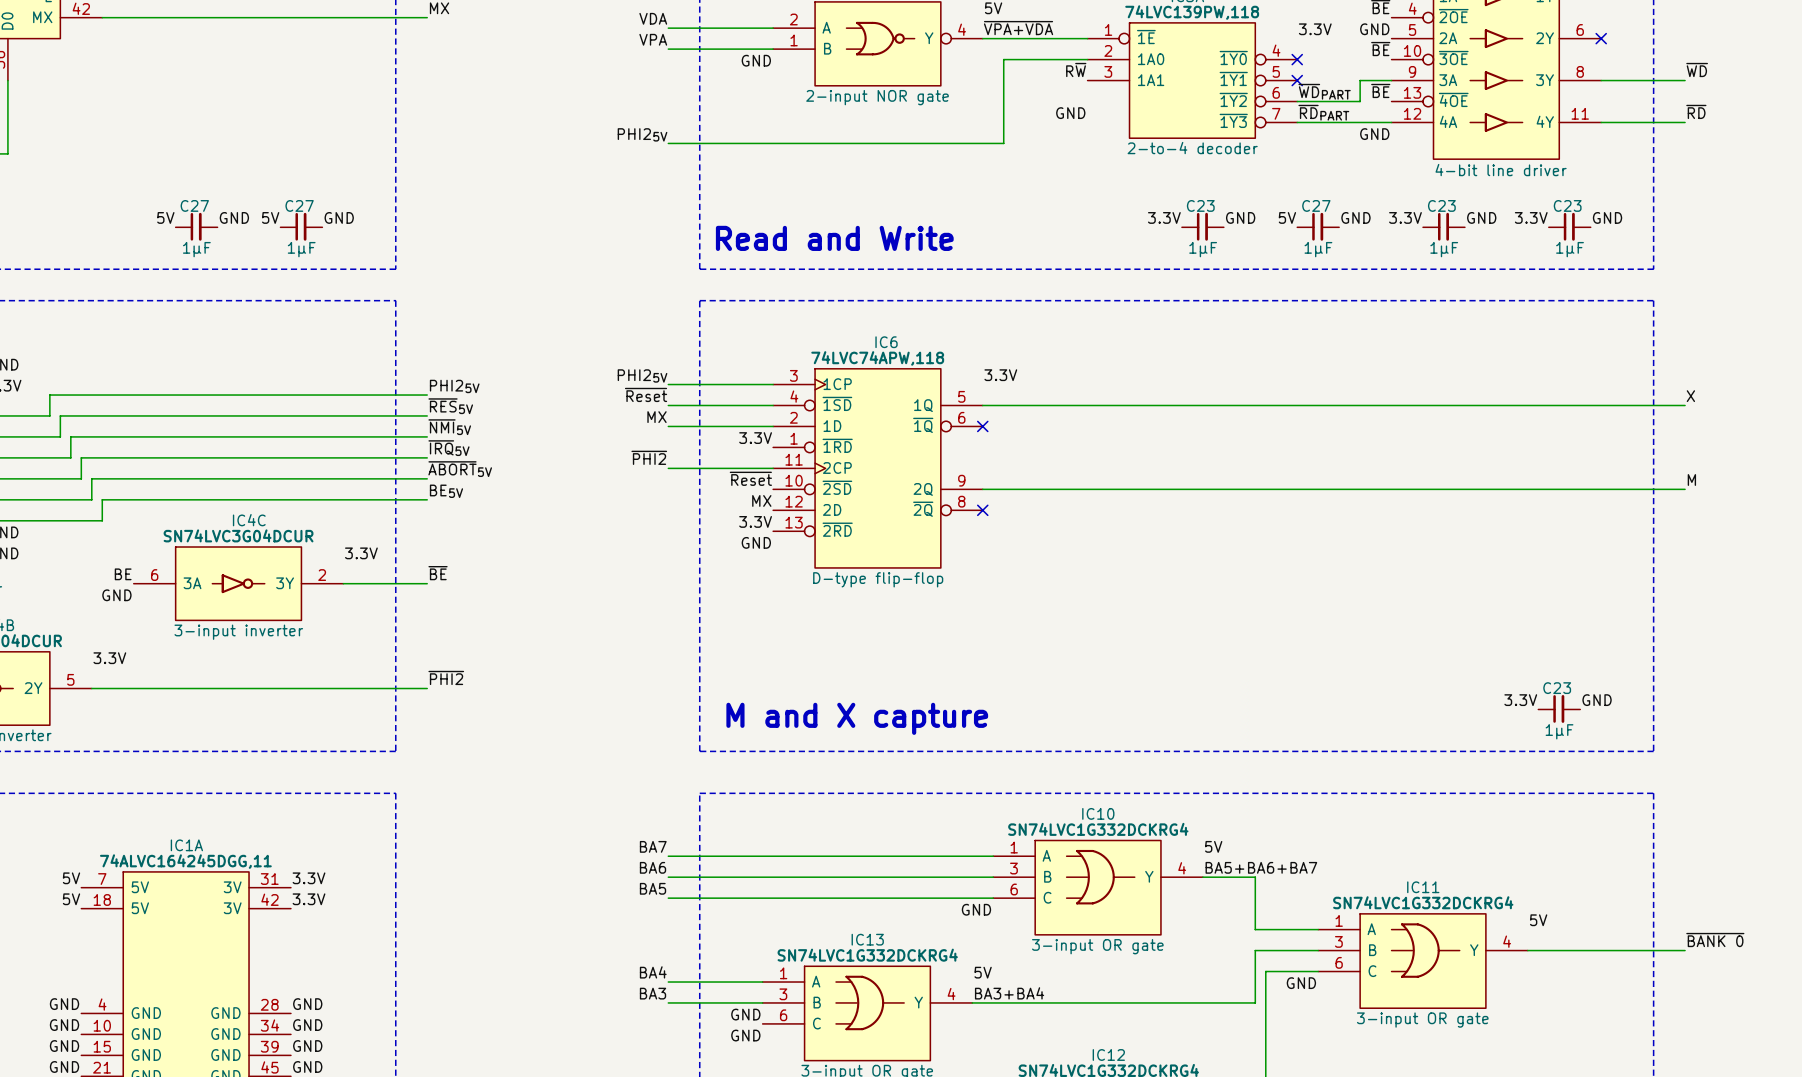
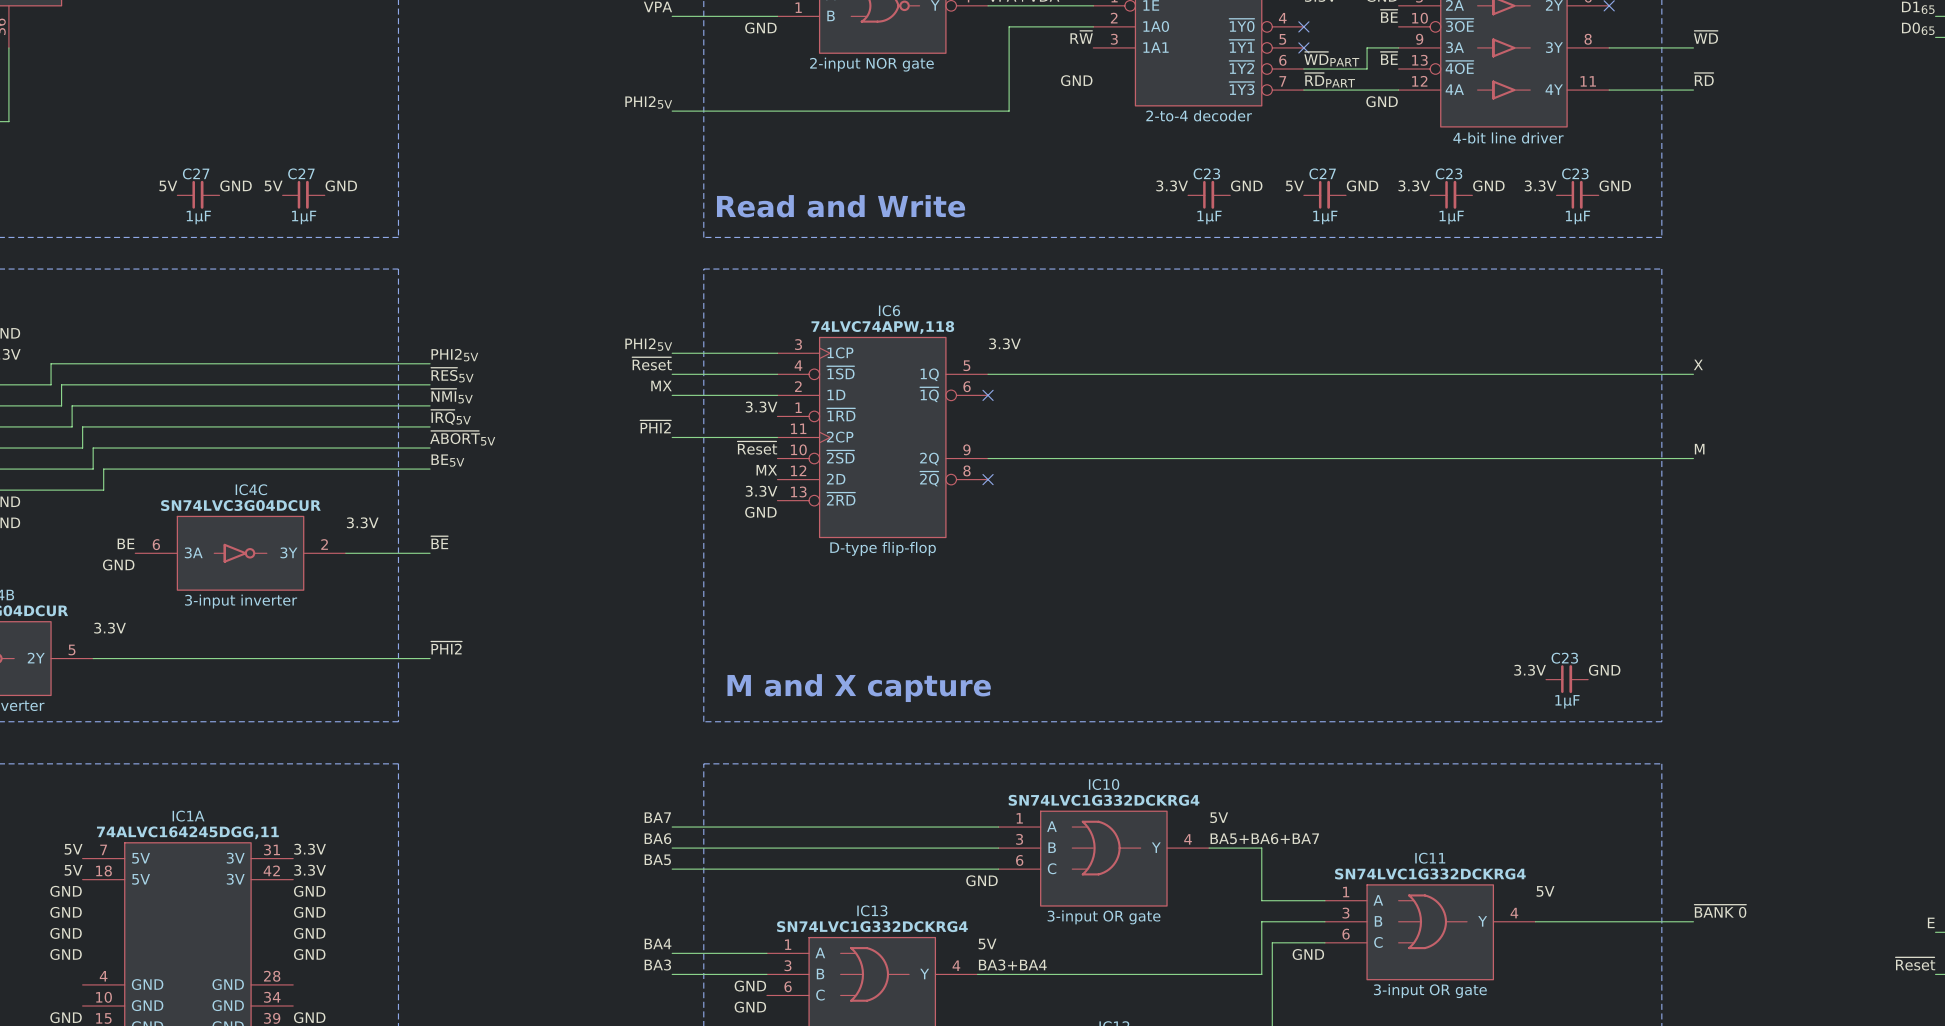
label: none -> GND (66, 891)
label: none -> GND (309, 891)
label: none -> GND (66, 912)
label: none -> GND (309, 912)
label: none -> GND (66, 933)
label: none -> GND (309, 933)
label position: GND (64, 1004) -> GND (66, 954)
label position: GND (307, 1004) -> GND (309, 954)
label: GND (64, 1025) -> none
label: GND (307, 1025) -> none

